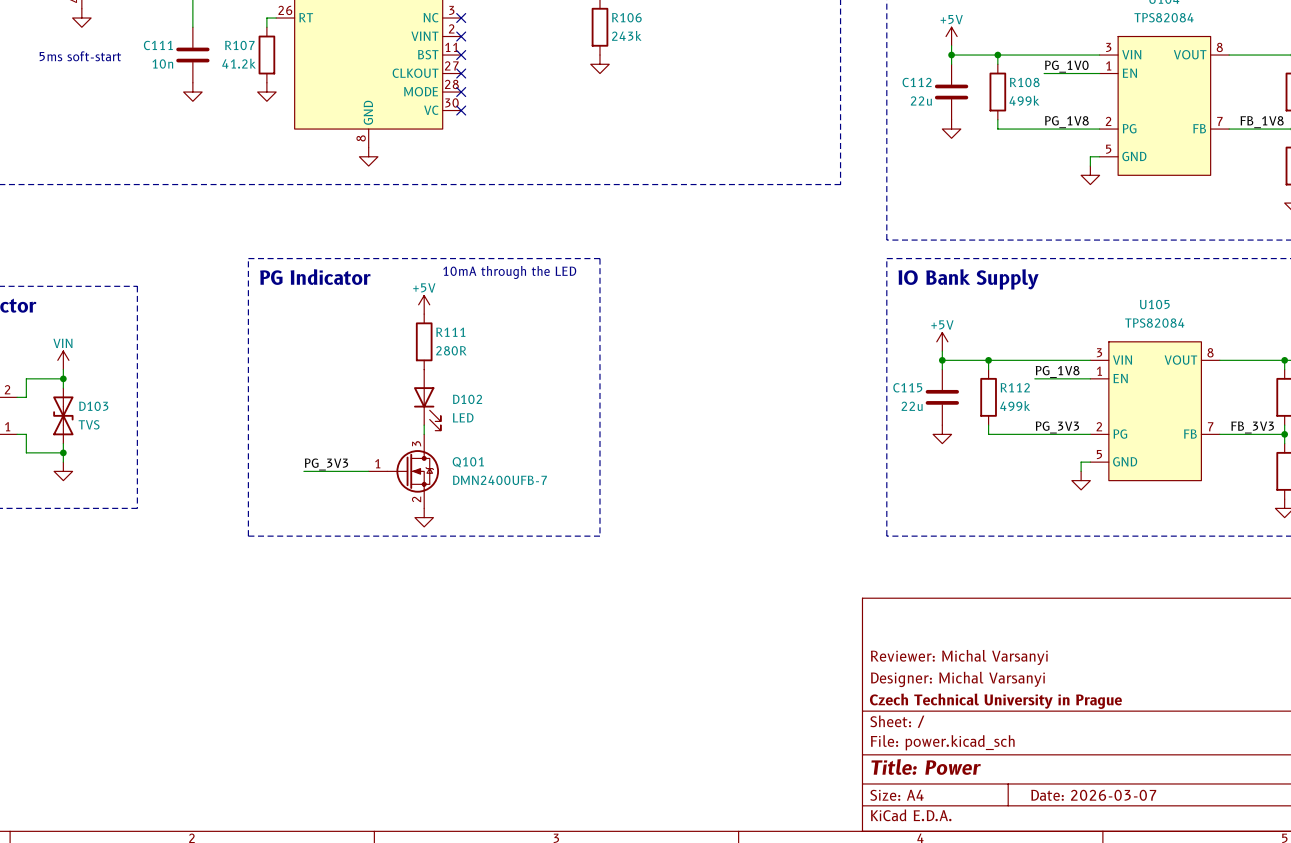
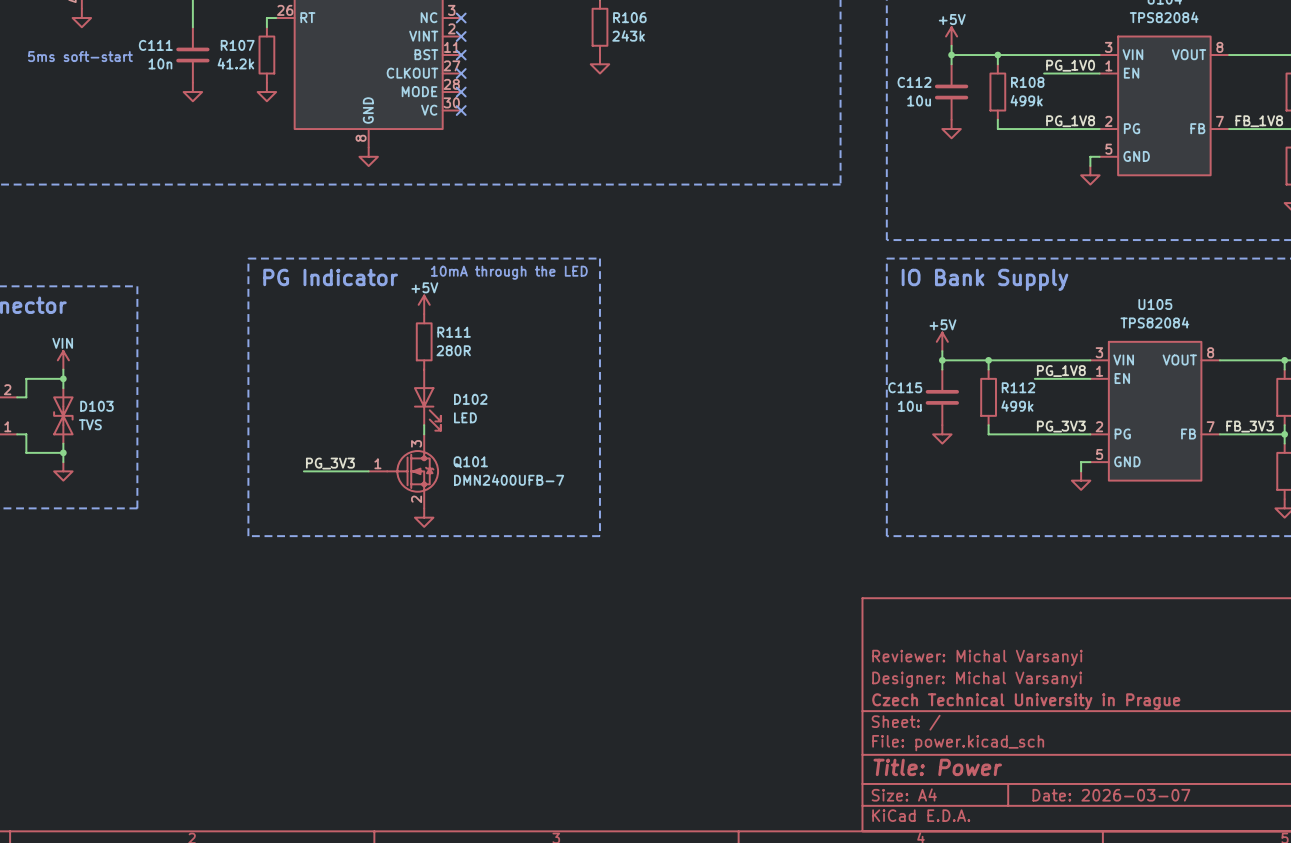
C112 value: 22u (921, 100) -> 10u (919, 100)
C115 value: 22u (912, 406) -> 10u (909, 406)

